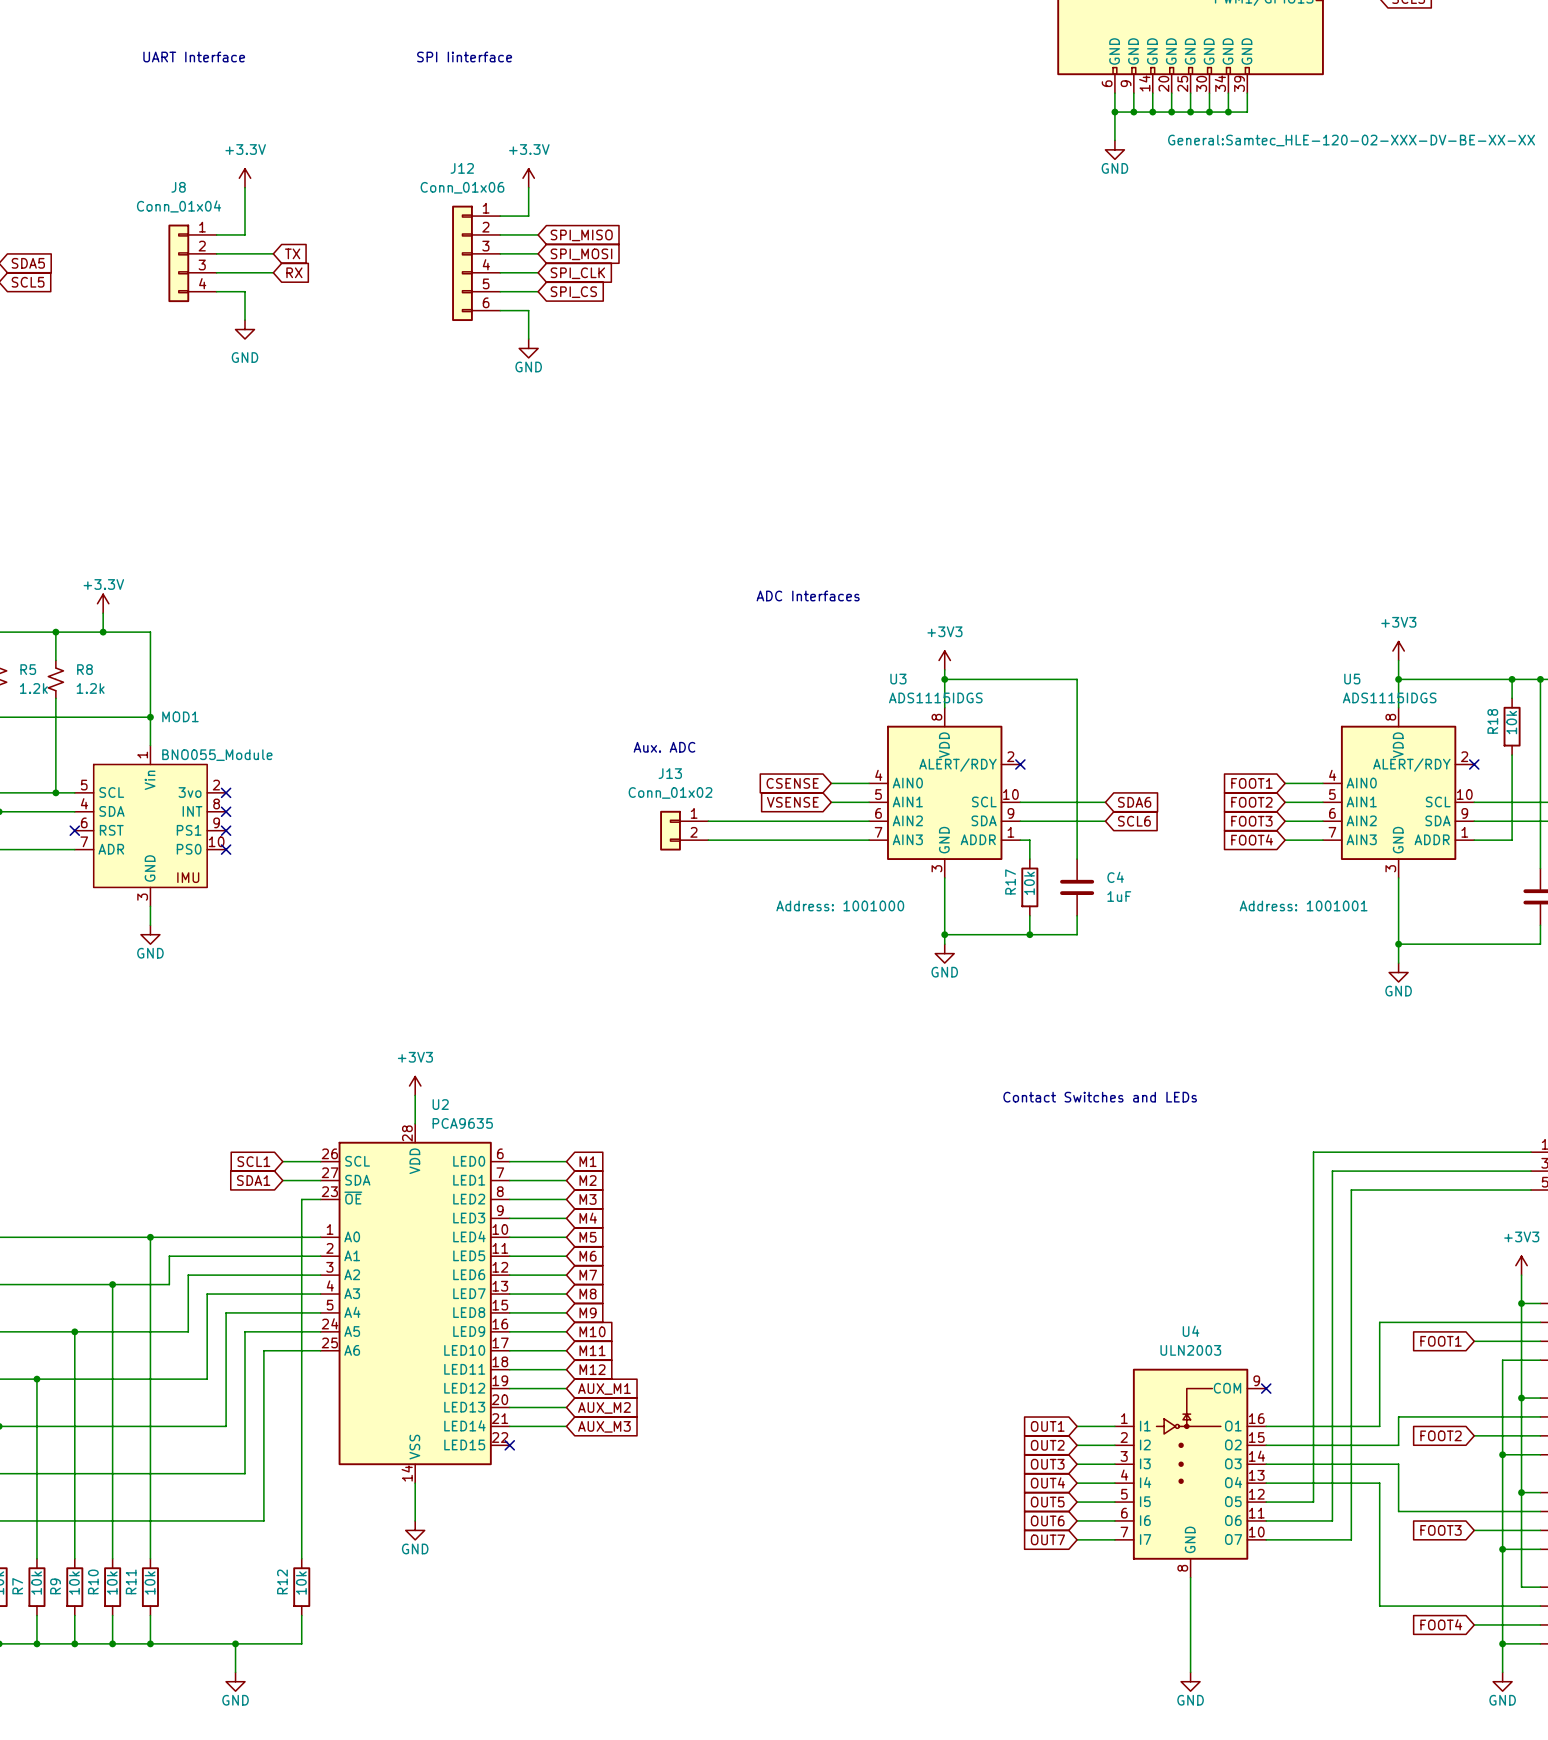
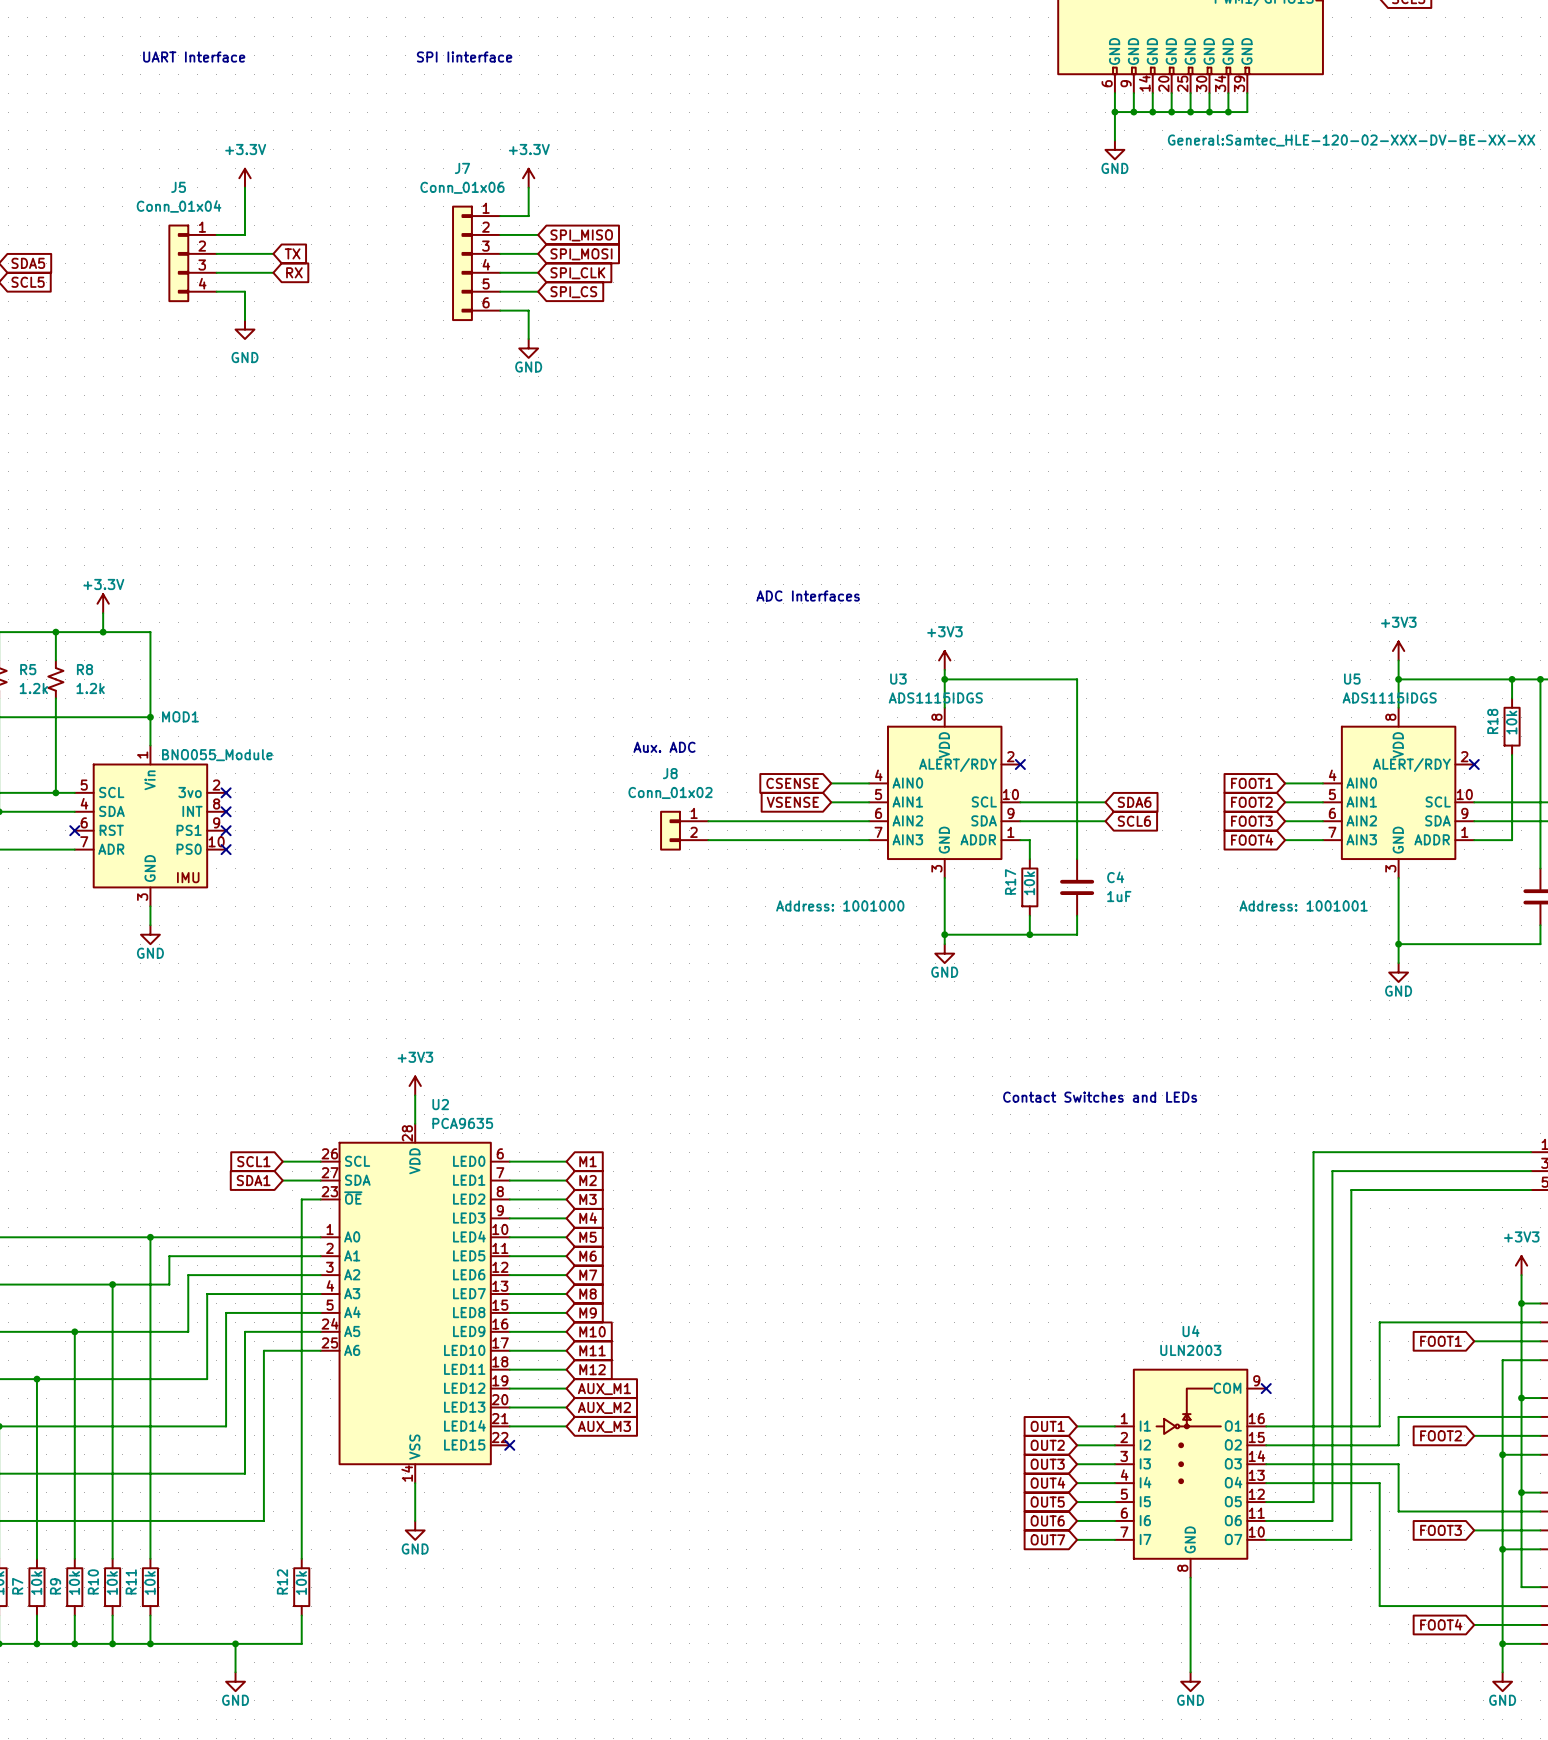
J12 name: J12 (462, 168) -> J7 (462, 168)
J8 name: J8 (178, 187) -> J5 (178, 187)
J13 name: J13 (670, 773) -> J8 (670, 773)

